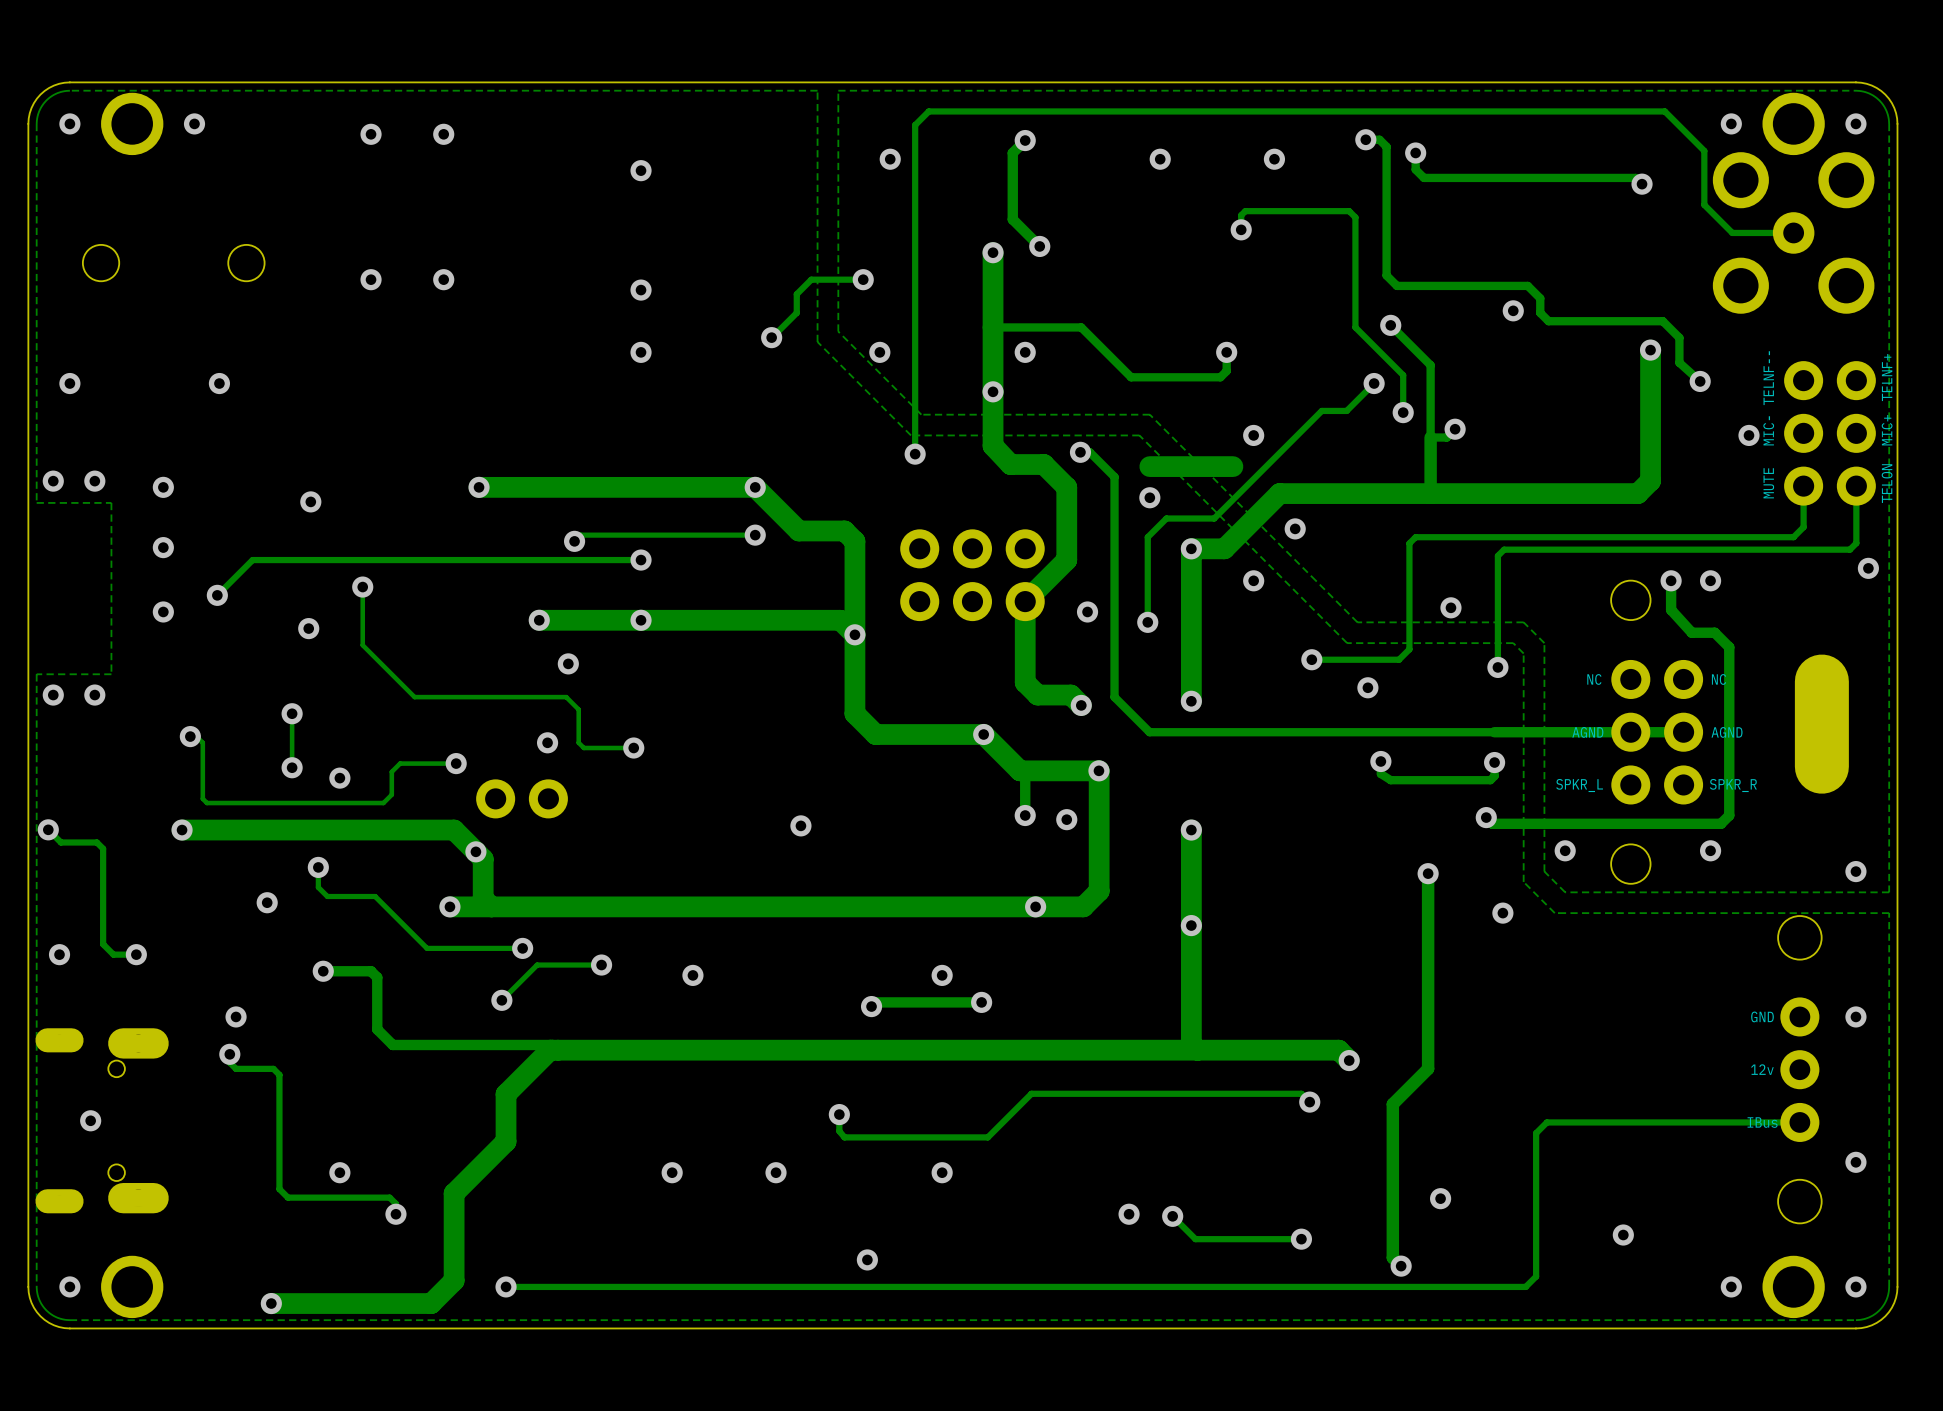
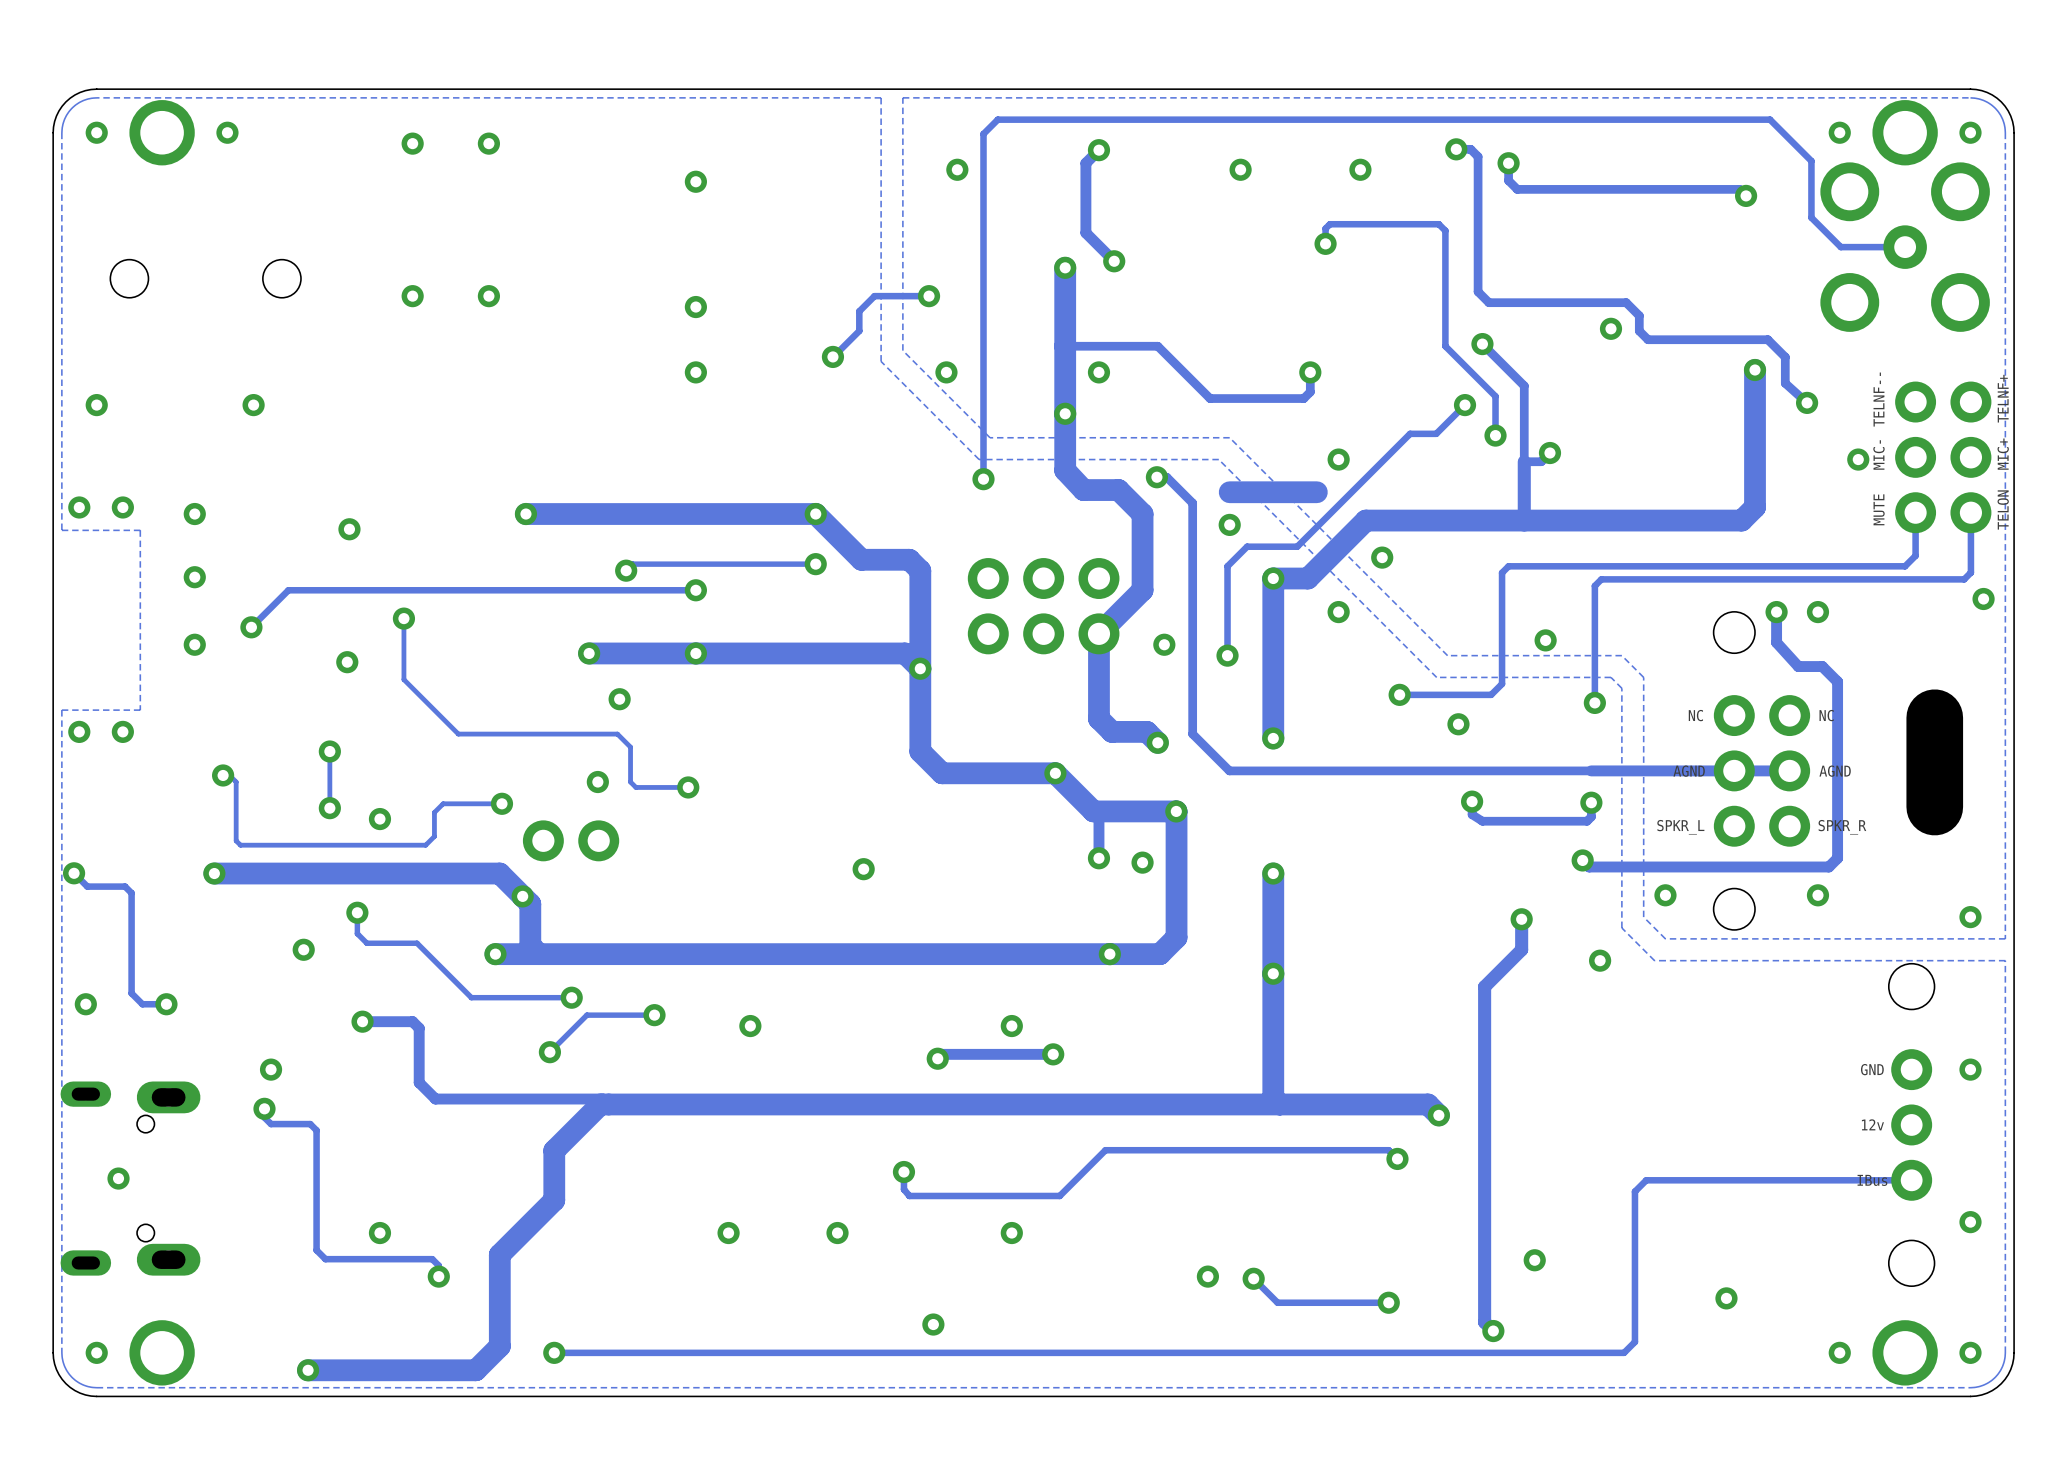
track: (1428, 902) (1428, 1068) (1392, 1104) -> (1521, 949) (1484, 986) (1484, 1161)

